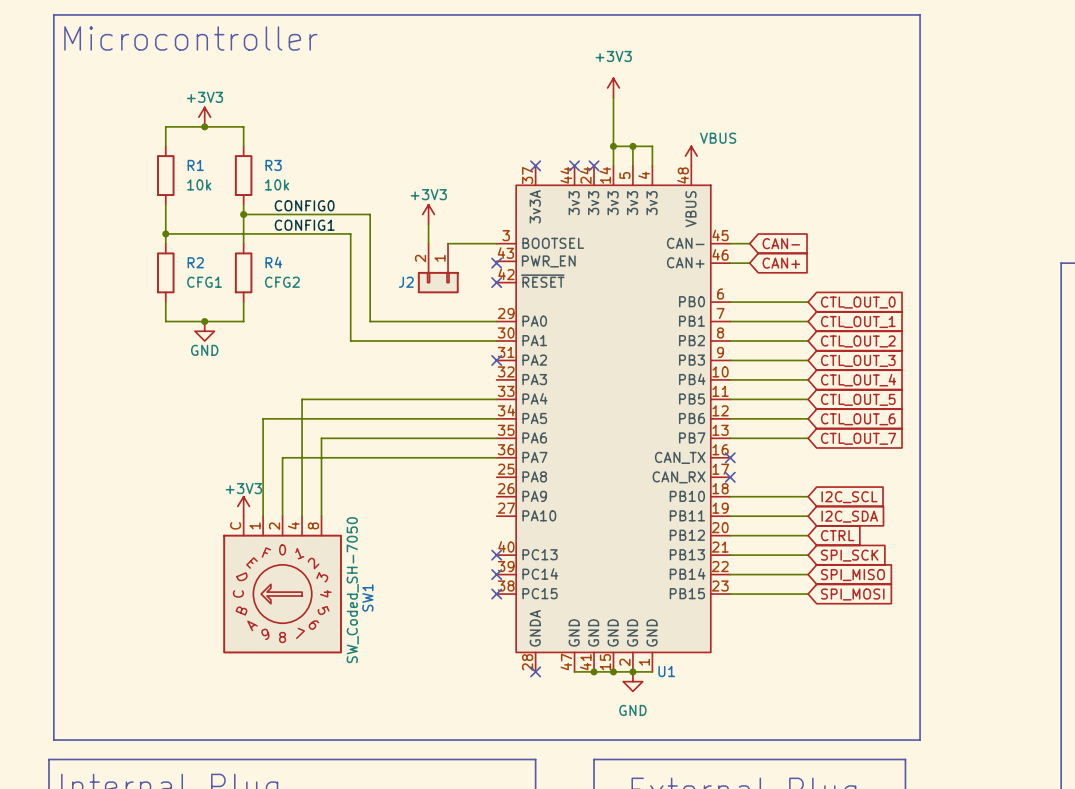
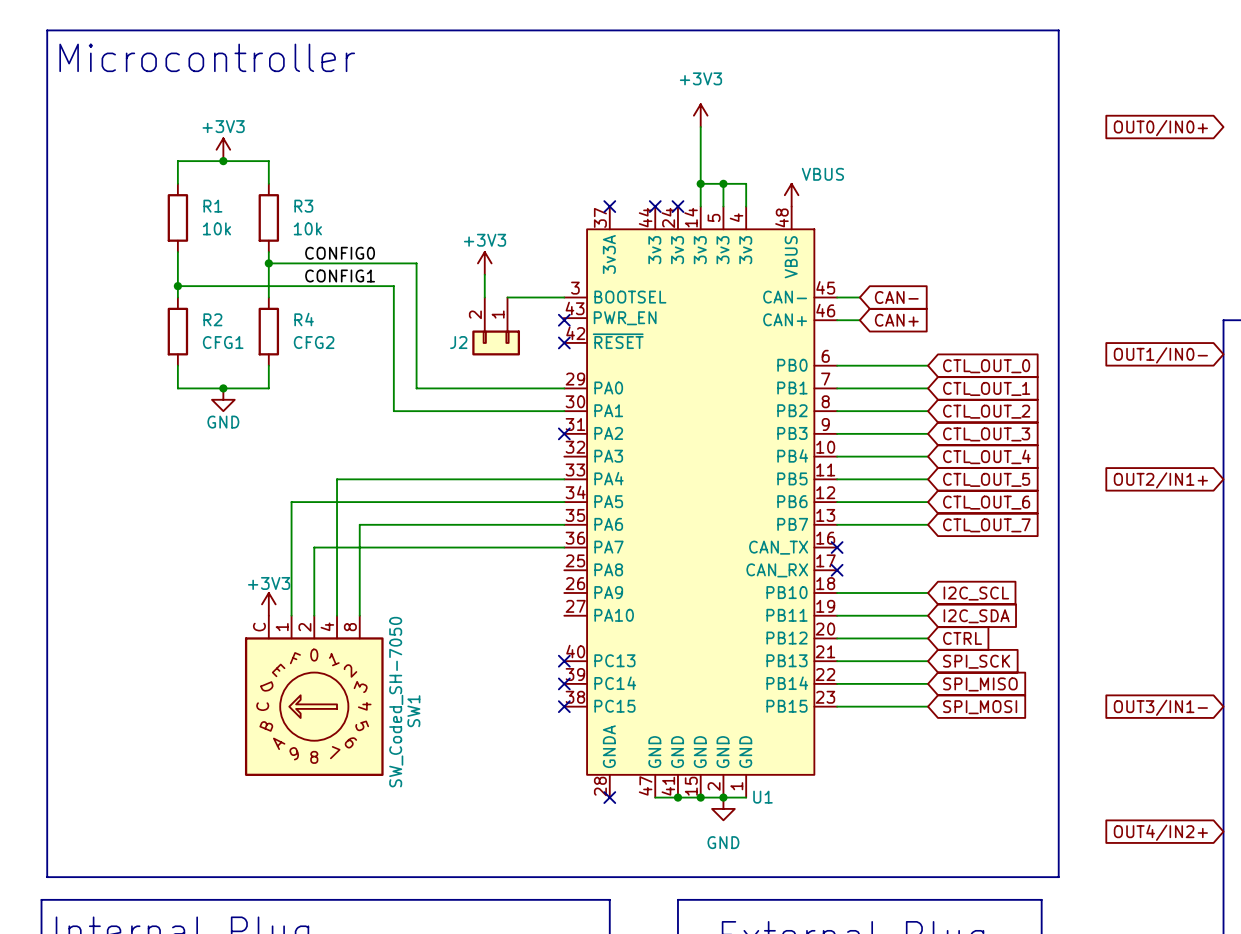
global label: none -> OUT0/IN0+ (1160, 128)
global label: none -> OUT1/IN0- (1160, 355)
global label: none -> OUT2/IN1+ (1160, 480)
global label: none -> OUT3/IN1- (1160, 707)
global label: none -> OUT4/IN2+ (1160, 832)

